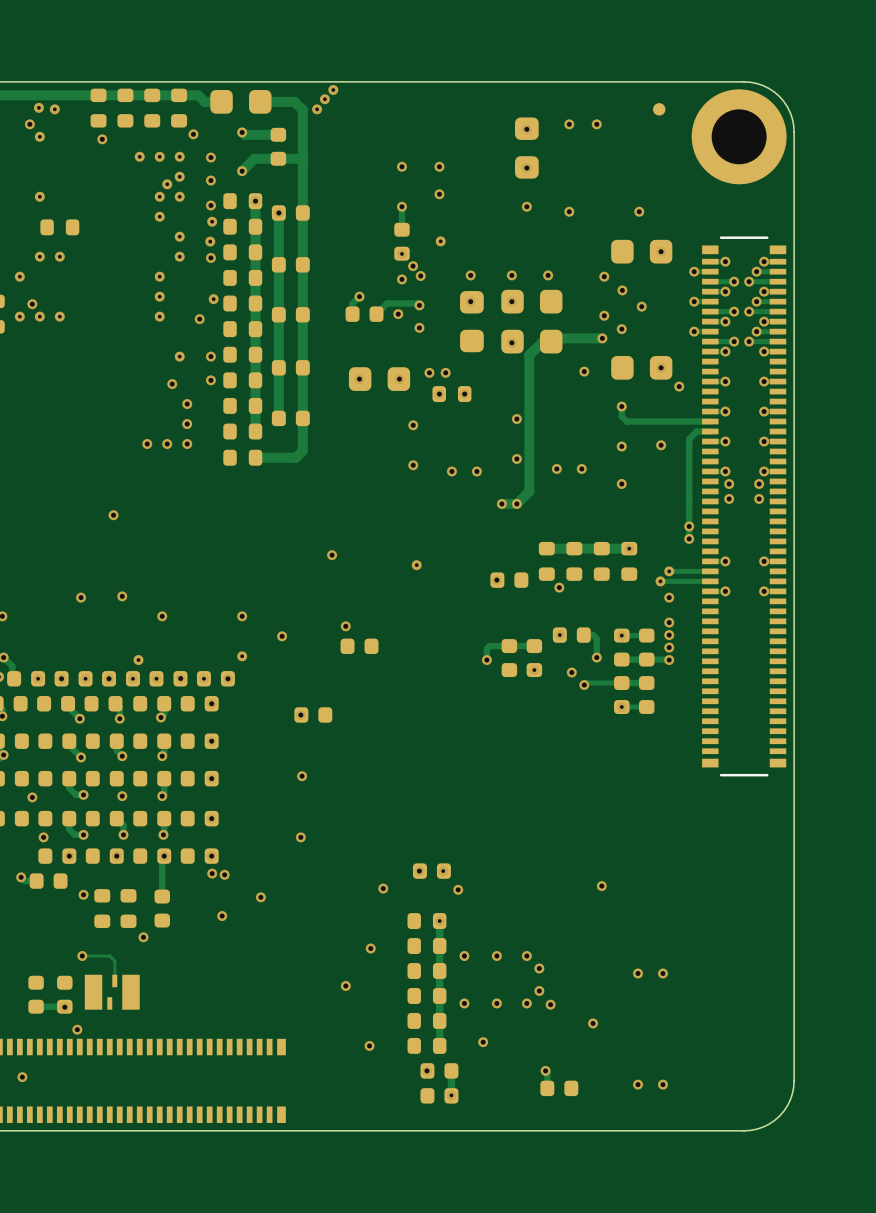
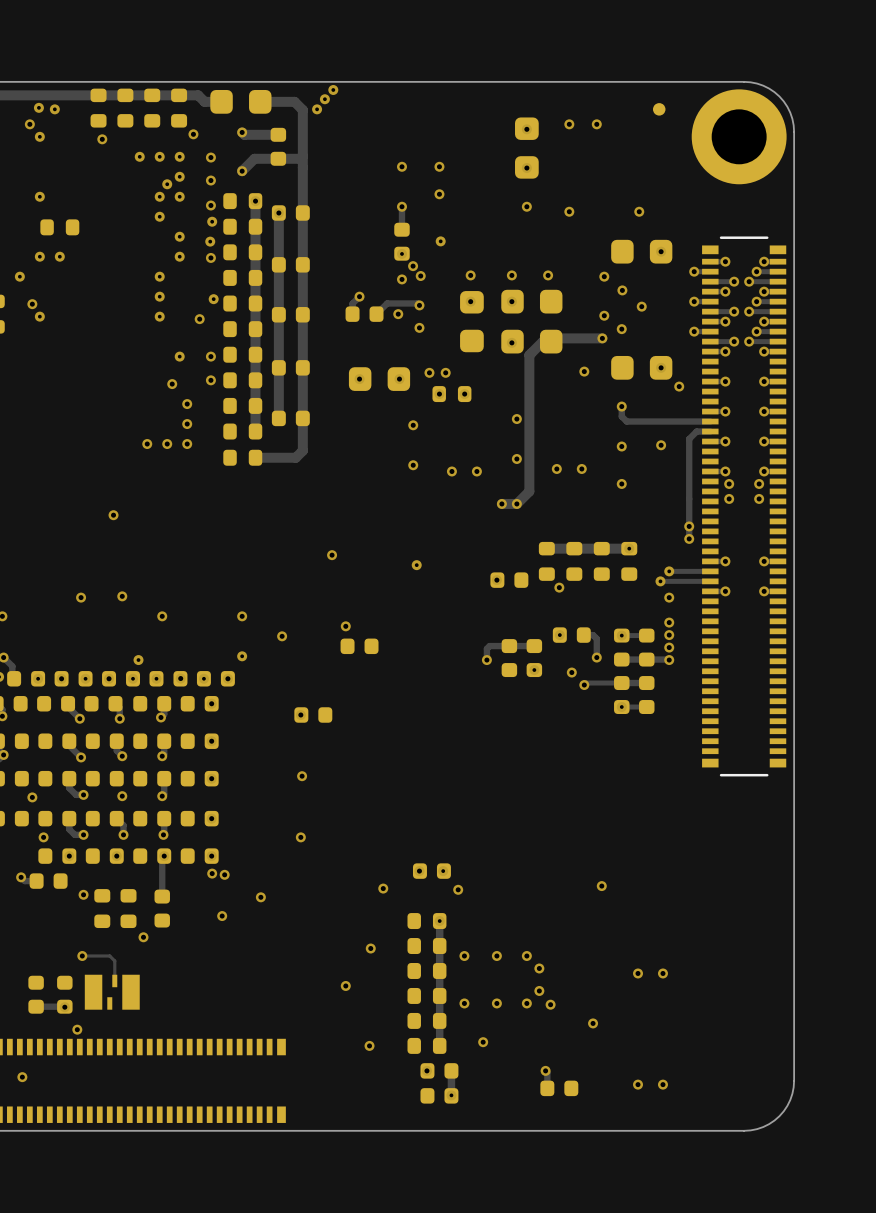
via: (19, 316) -> none
via: (59, 316) -> none

